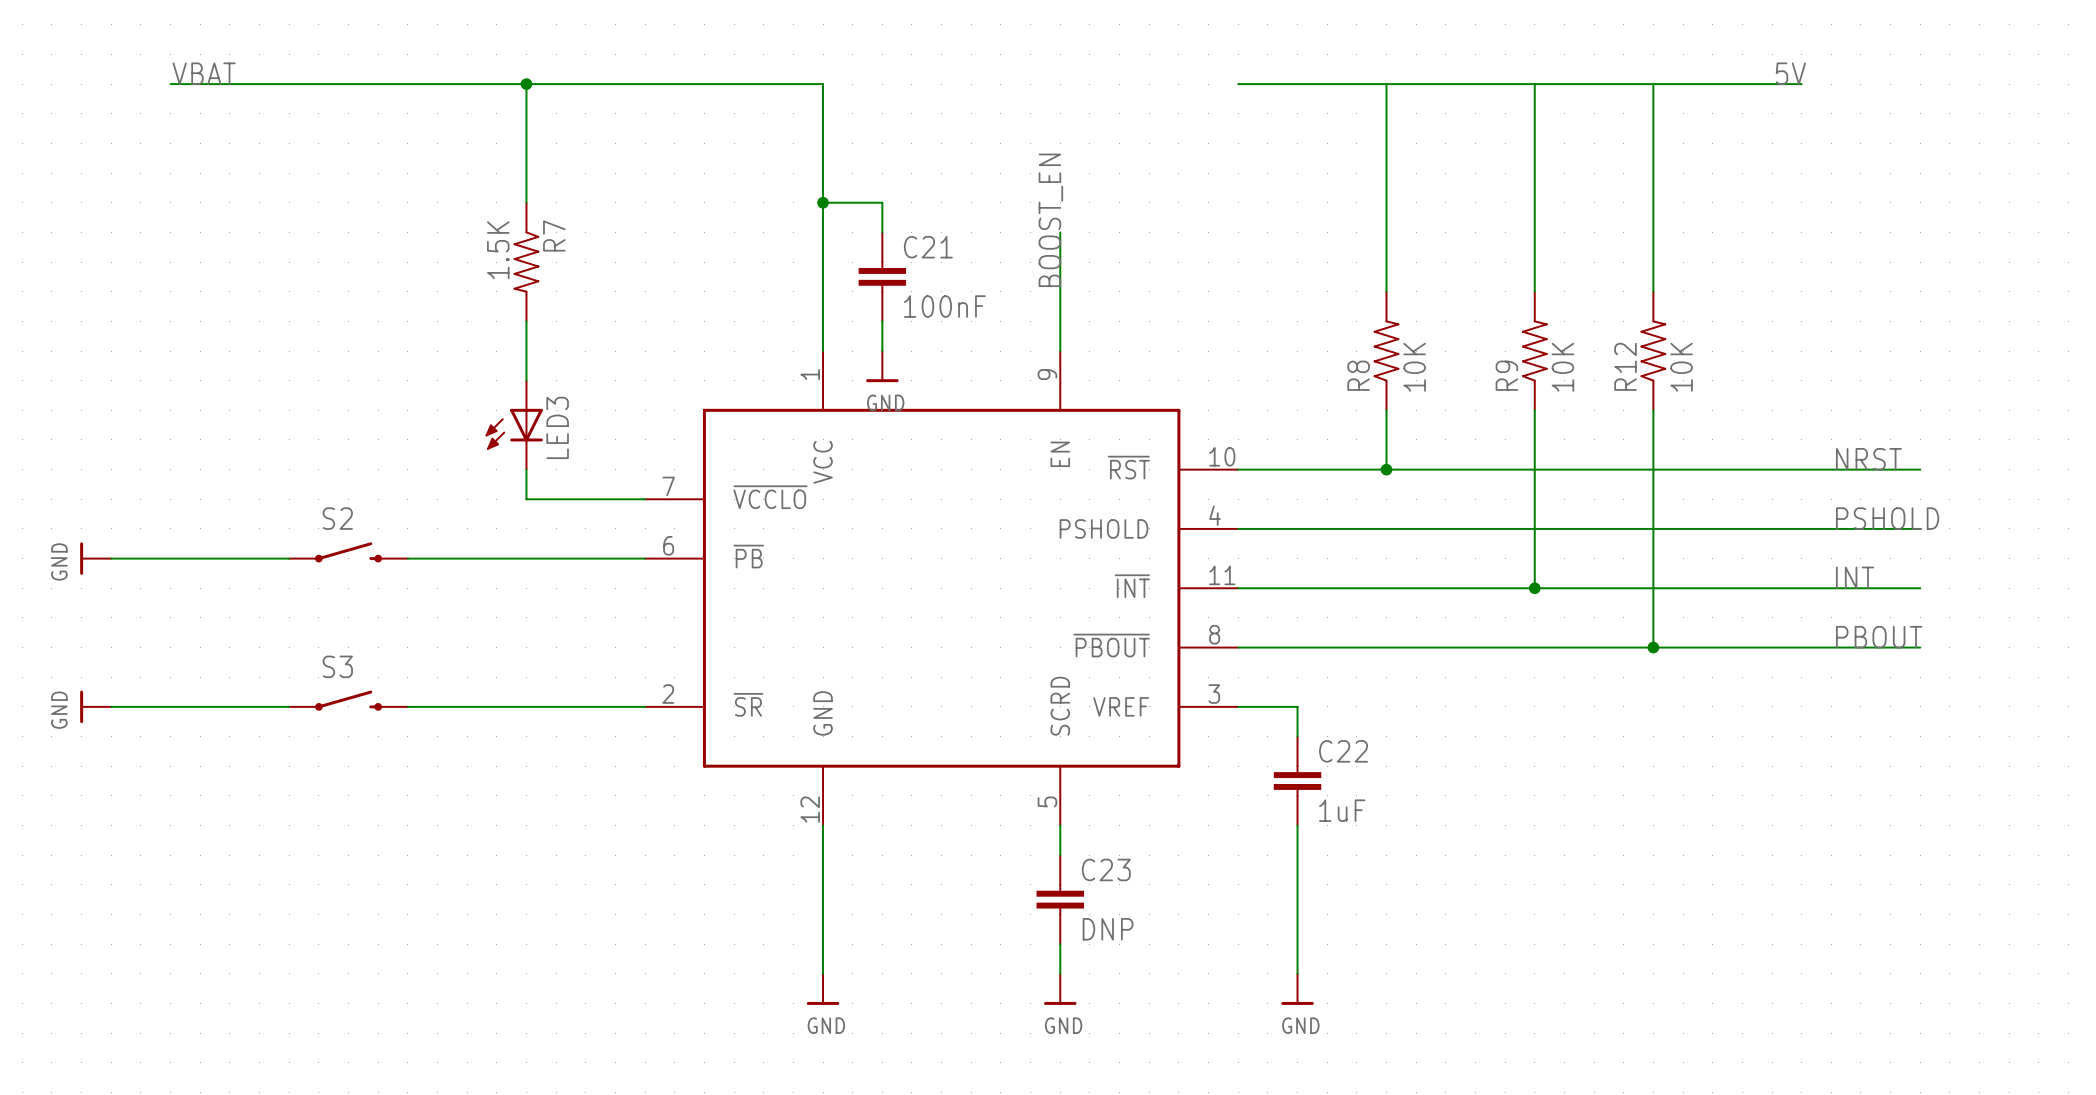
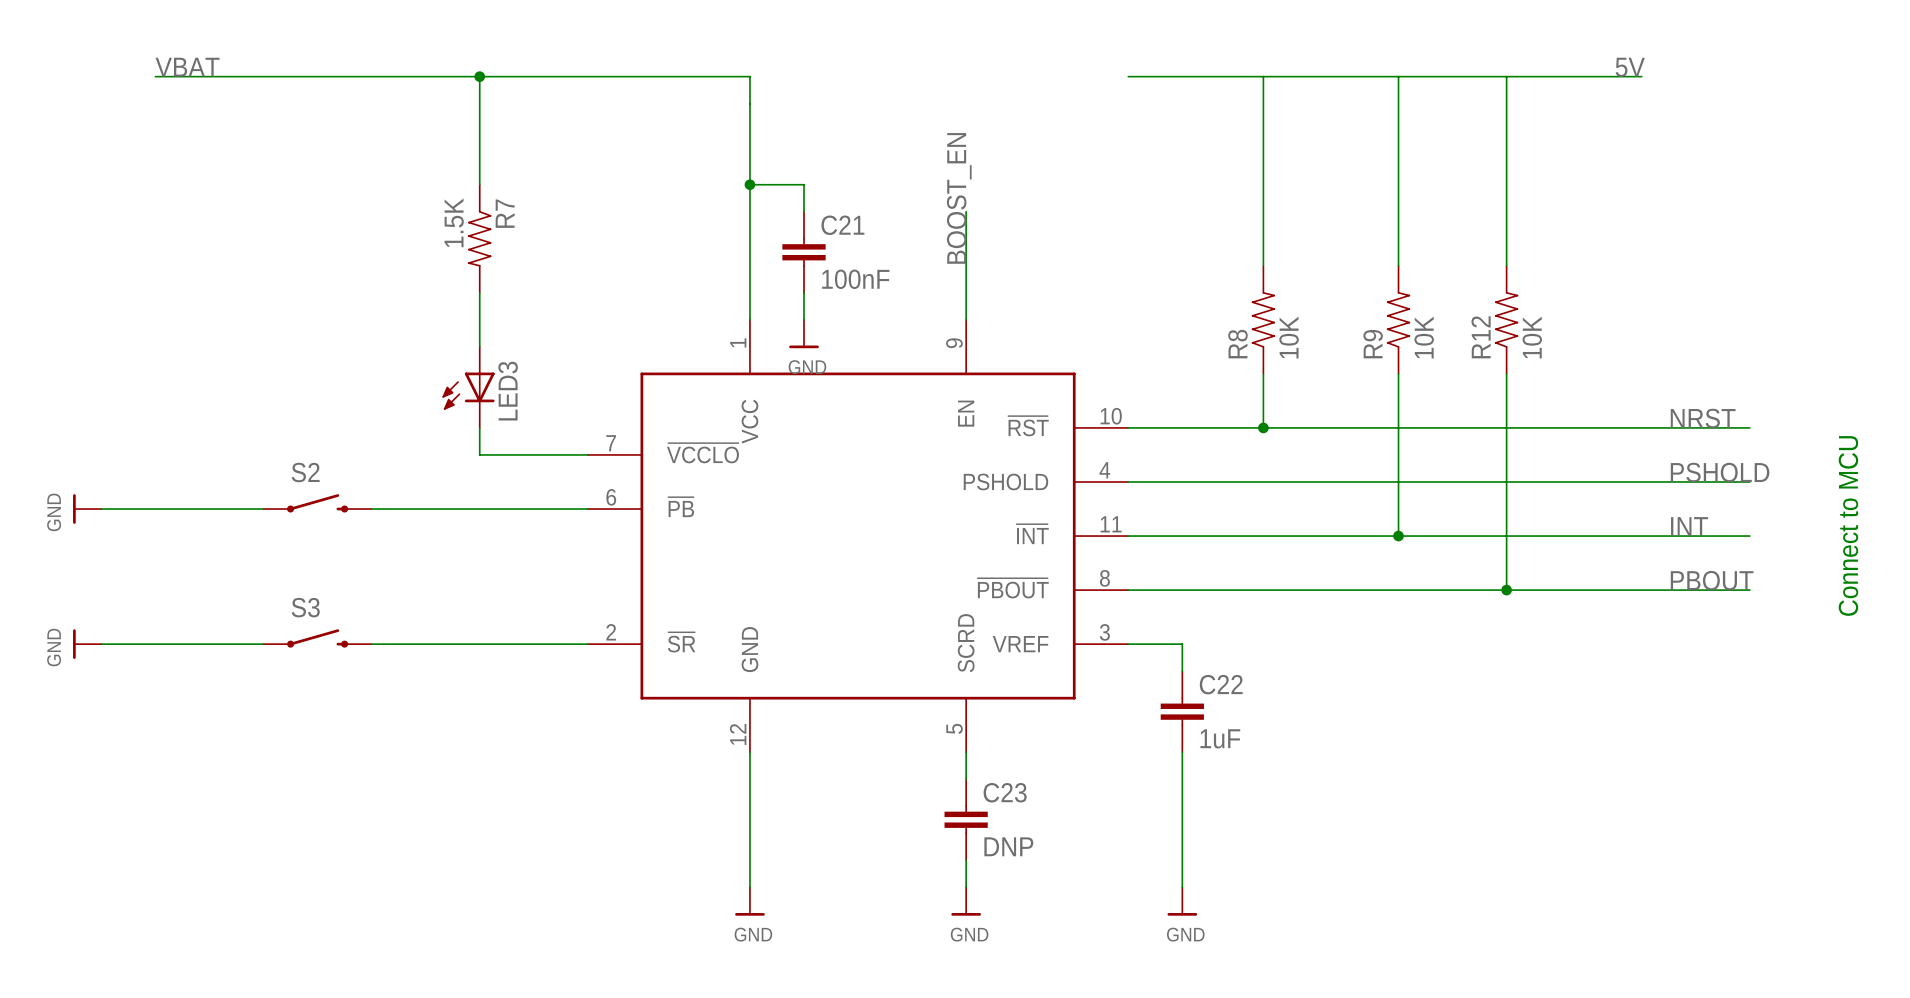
text: none -> Connect to MCU (1848, 525)

